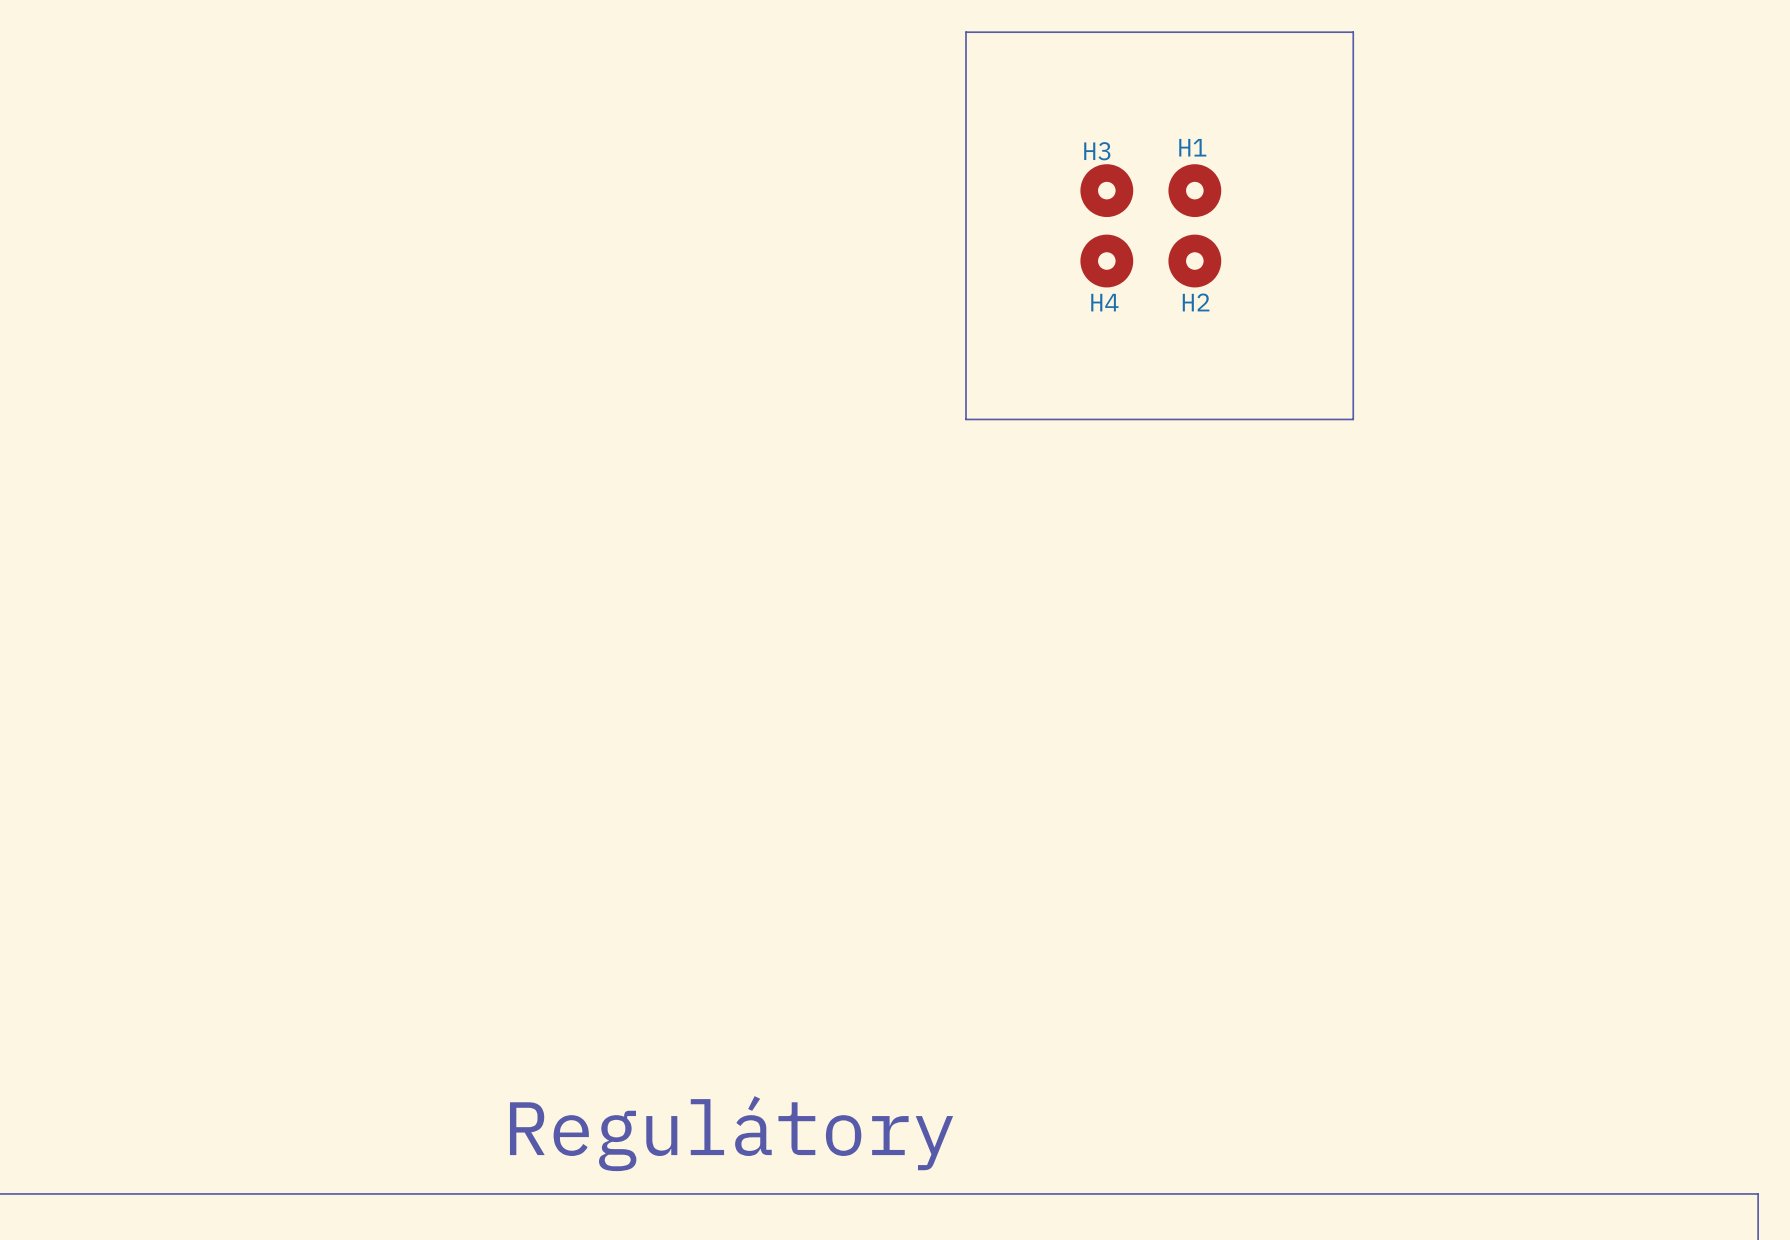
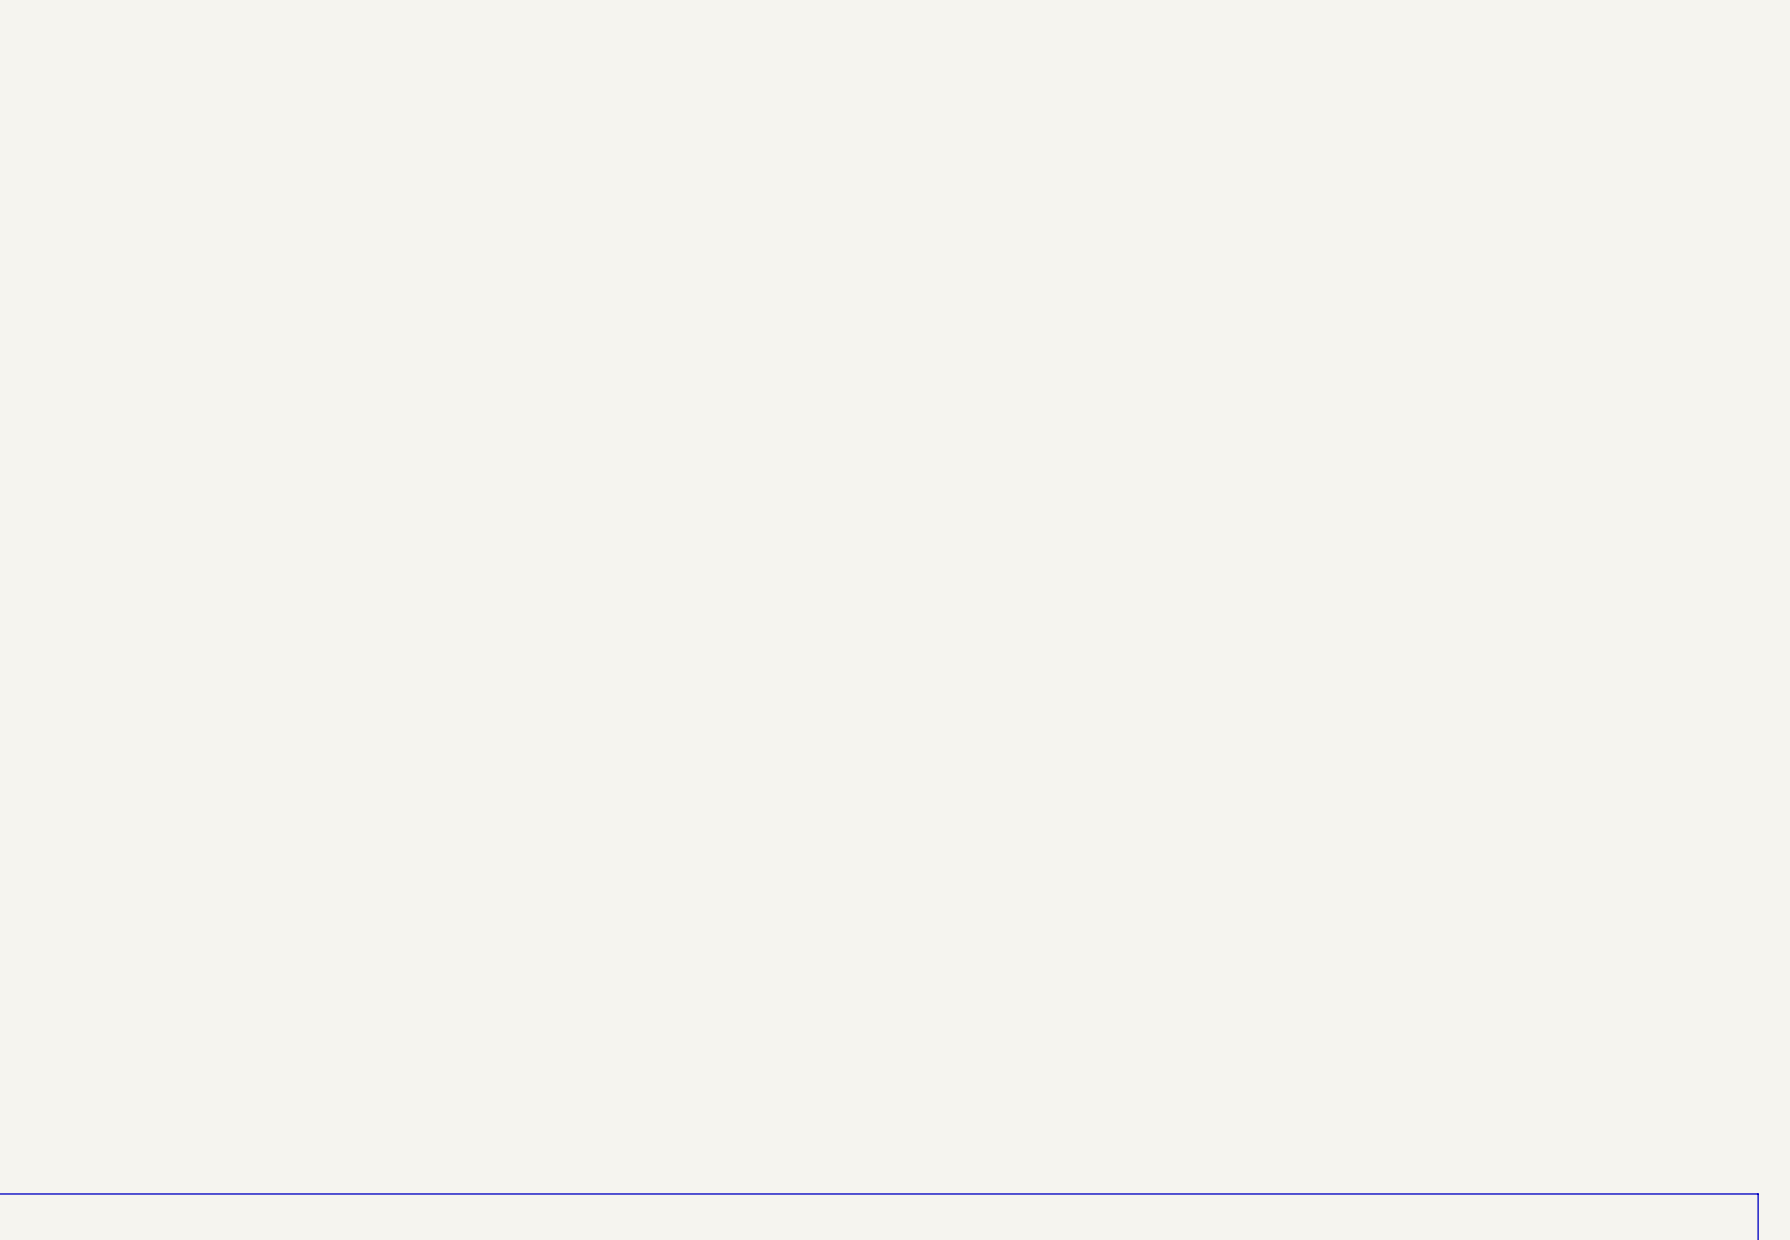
line: (966, 32) (1353, 32) (1353, 419) (966, 419) (966, 32) -> none
H3: (1106, 190) -> none
H1: (1194, 190) -> none
H4: (1106, 261) -> none
H2: (1194, 261) -> none
text: Regulátory (731, 1133) -> none

